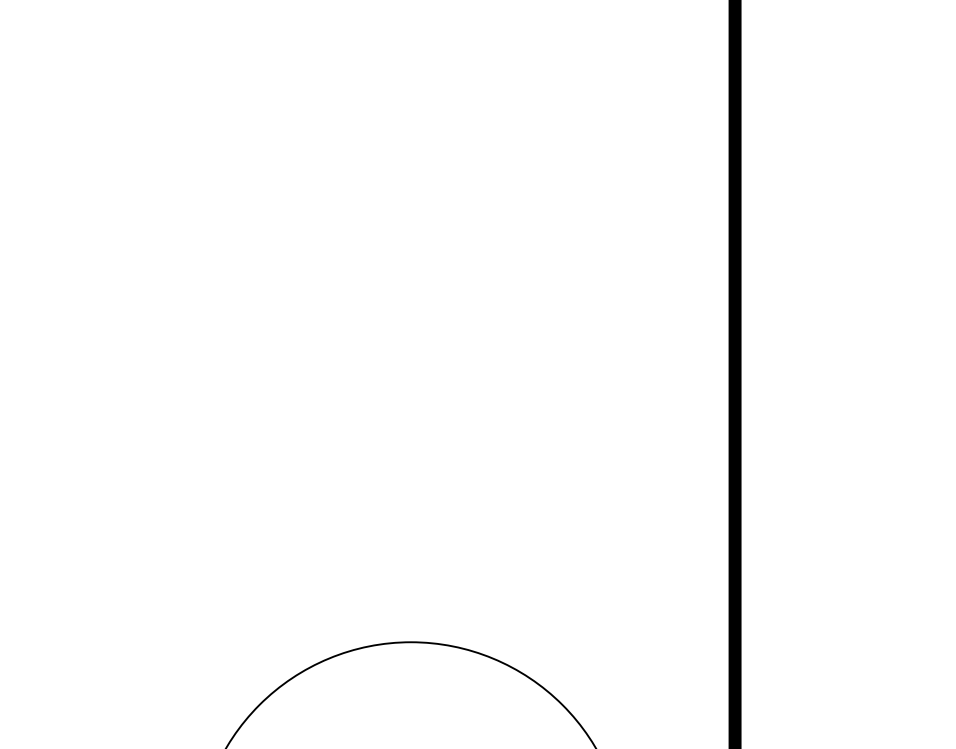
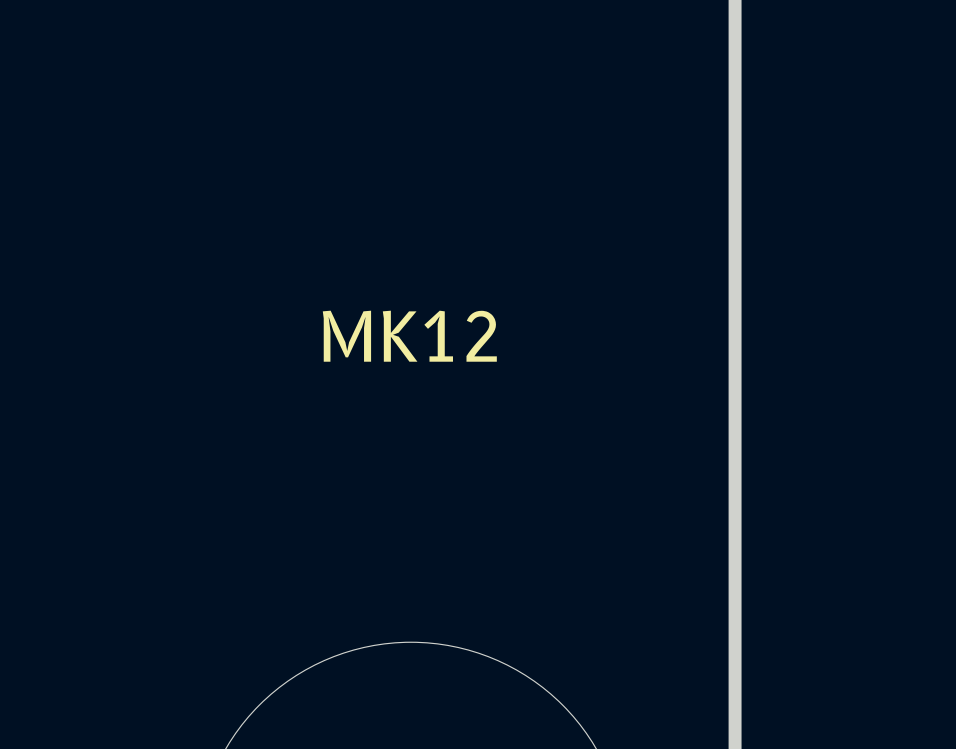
MK12 name: none -> MK12 (409, 336)

